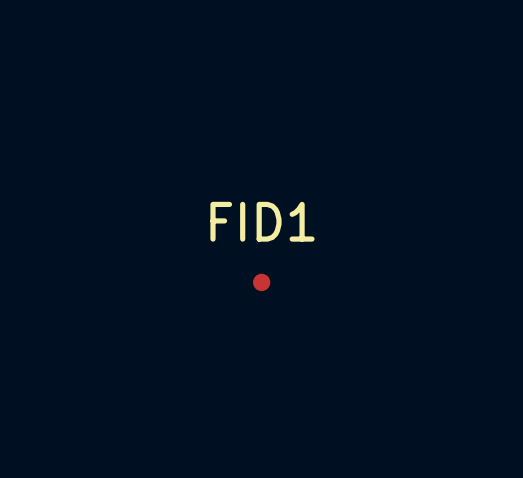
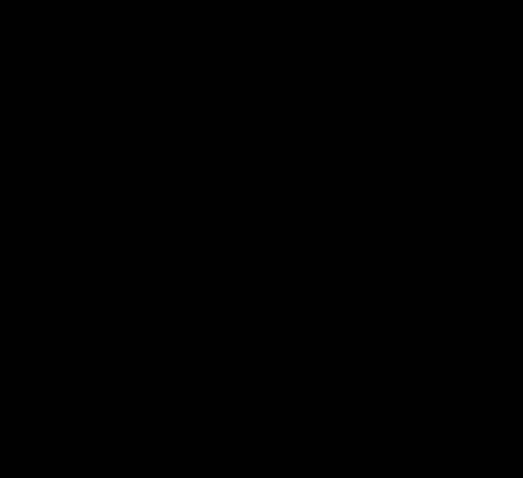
FID1: (261, 282) -> none

